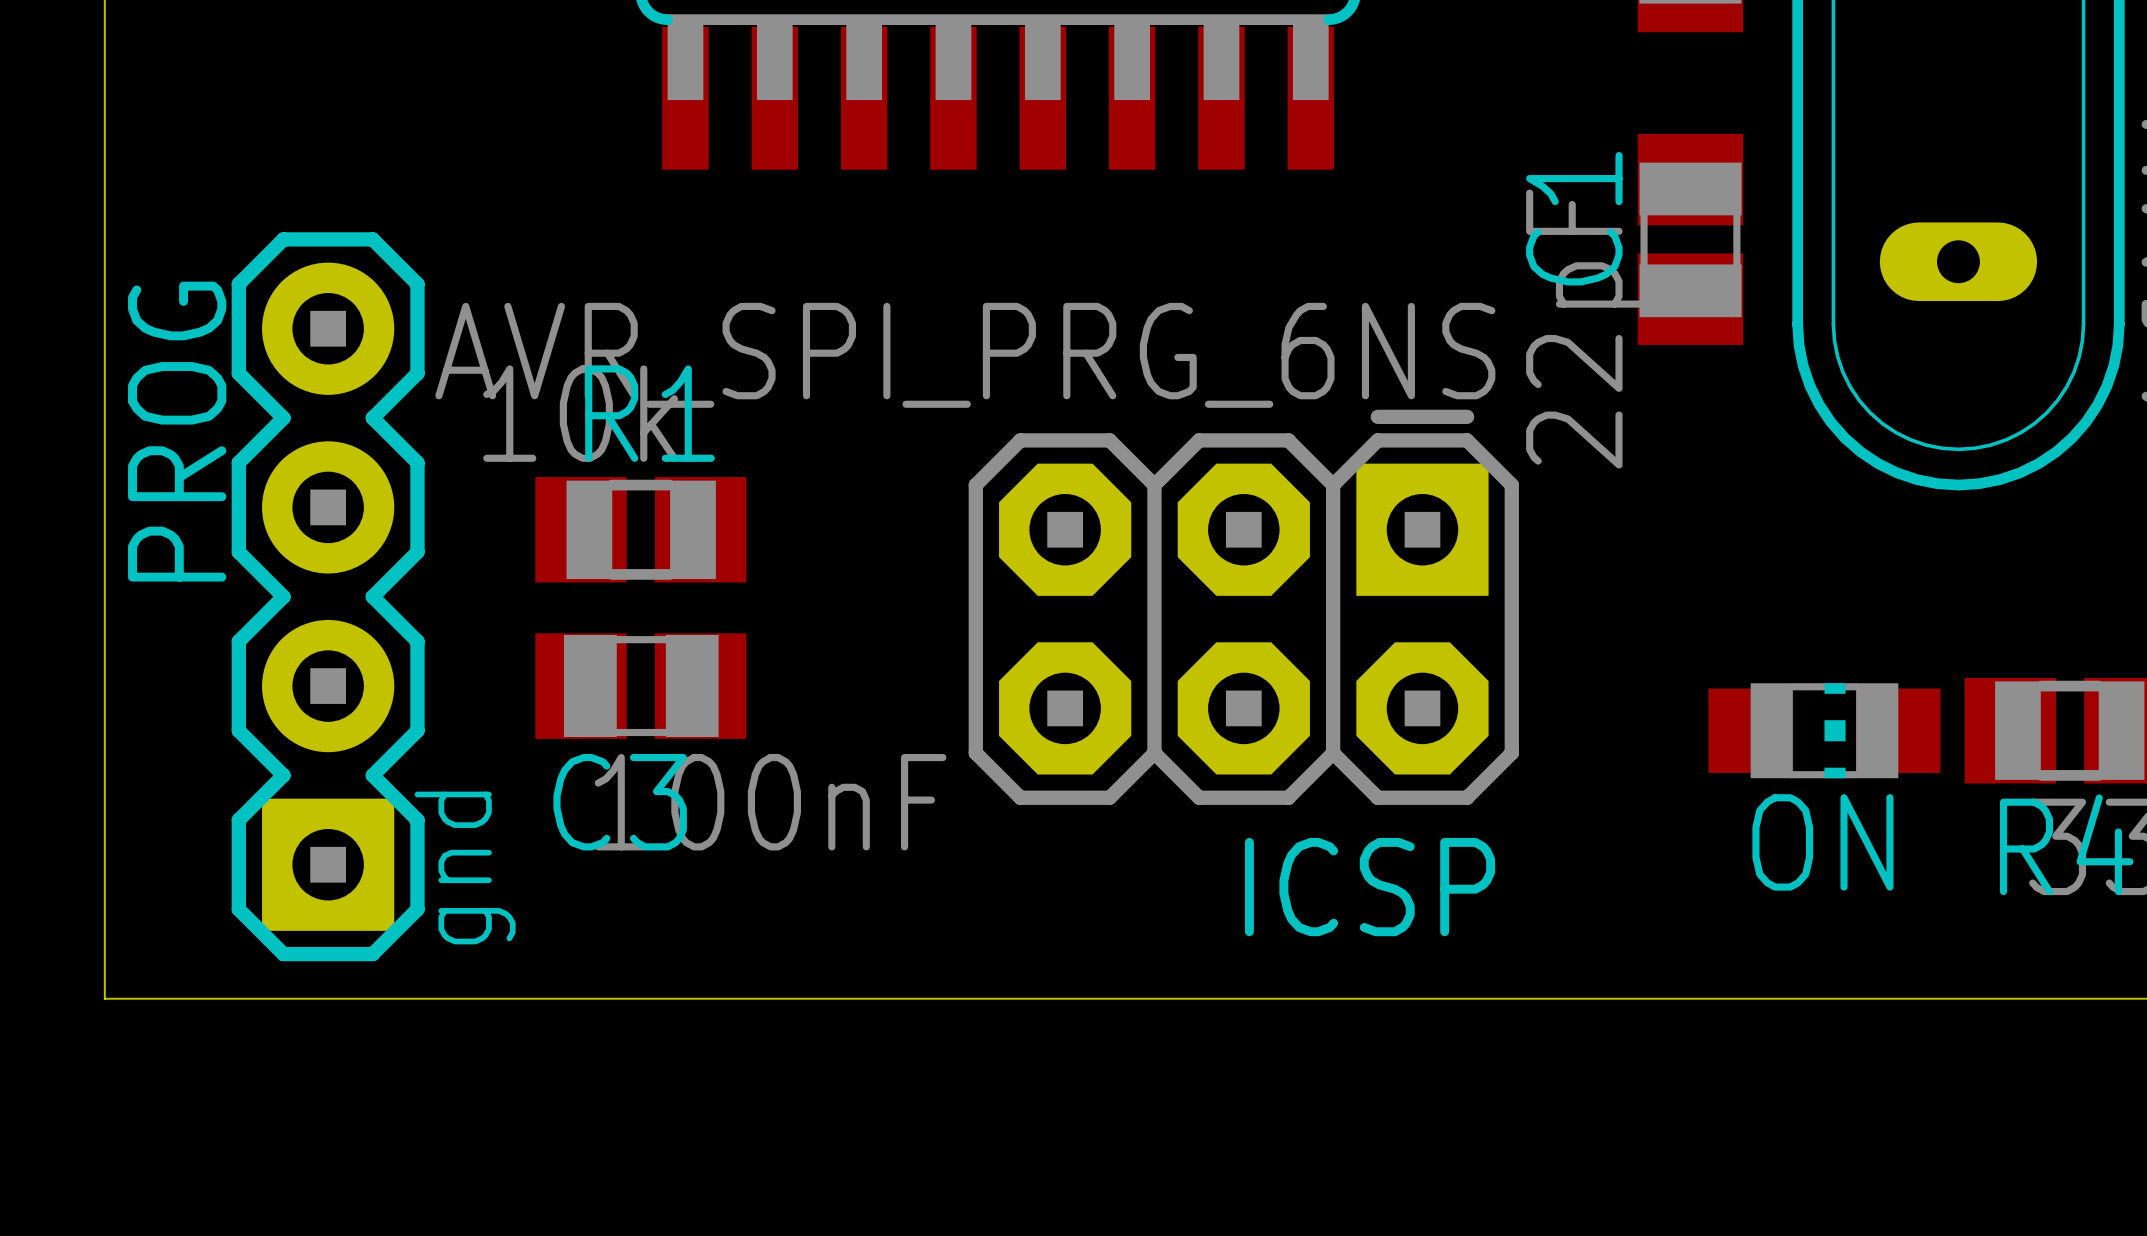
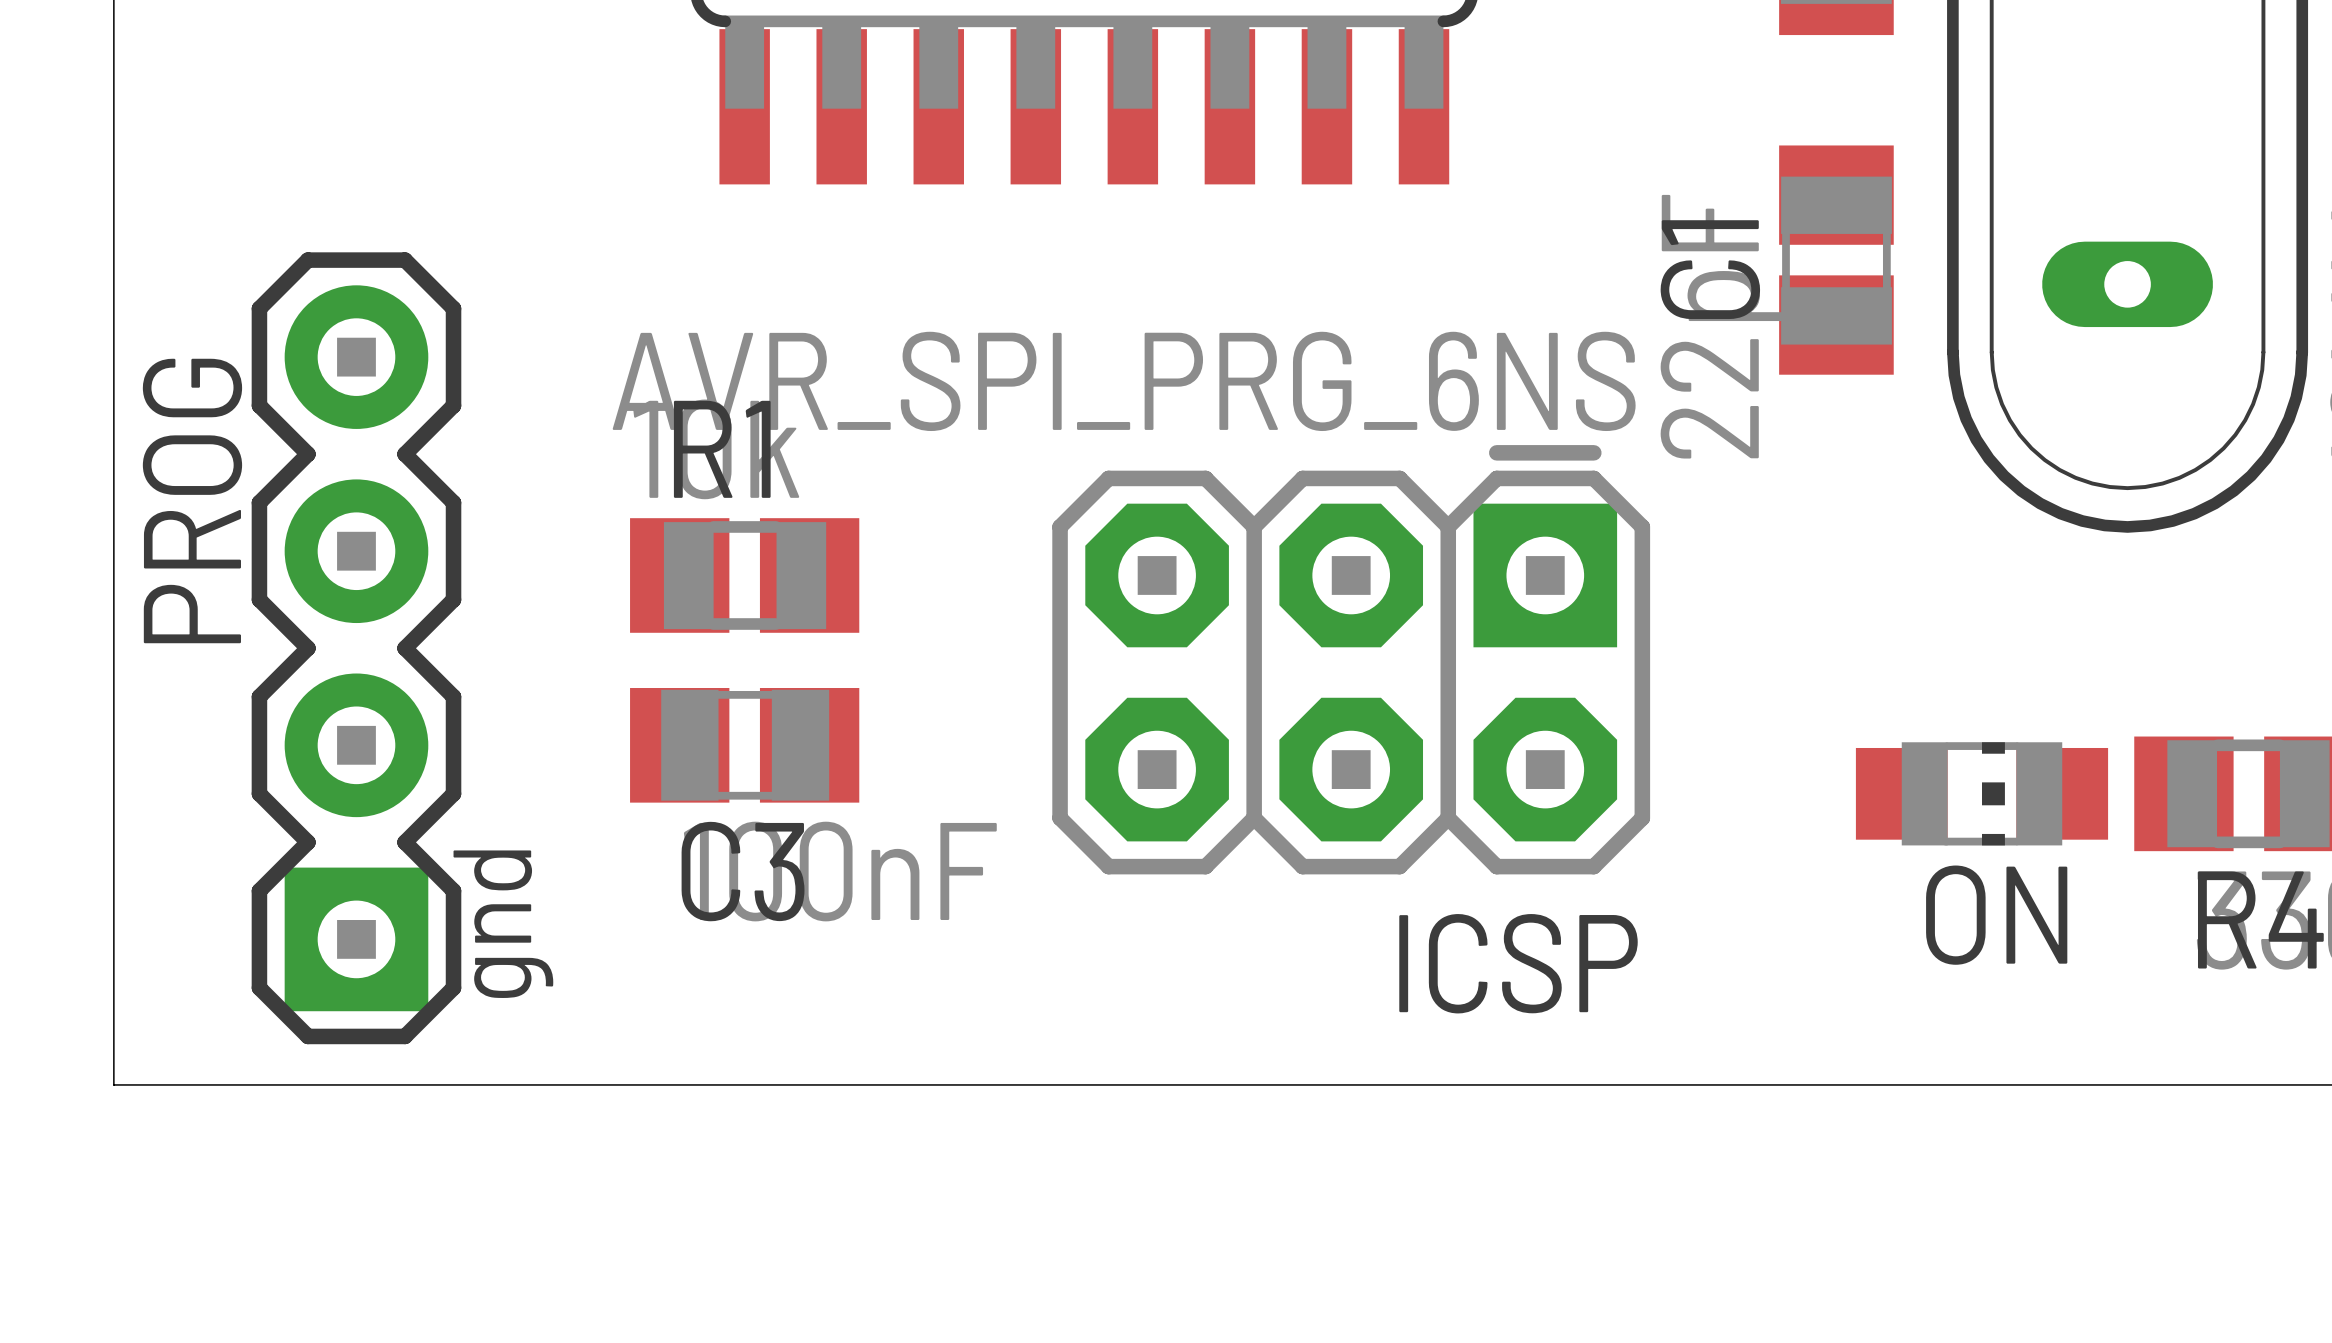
R1 position: (640, 529) -> (744, 575)
C3 position: (640, 686) -> (744, 745)

